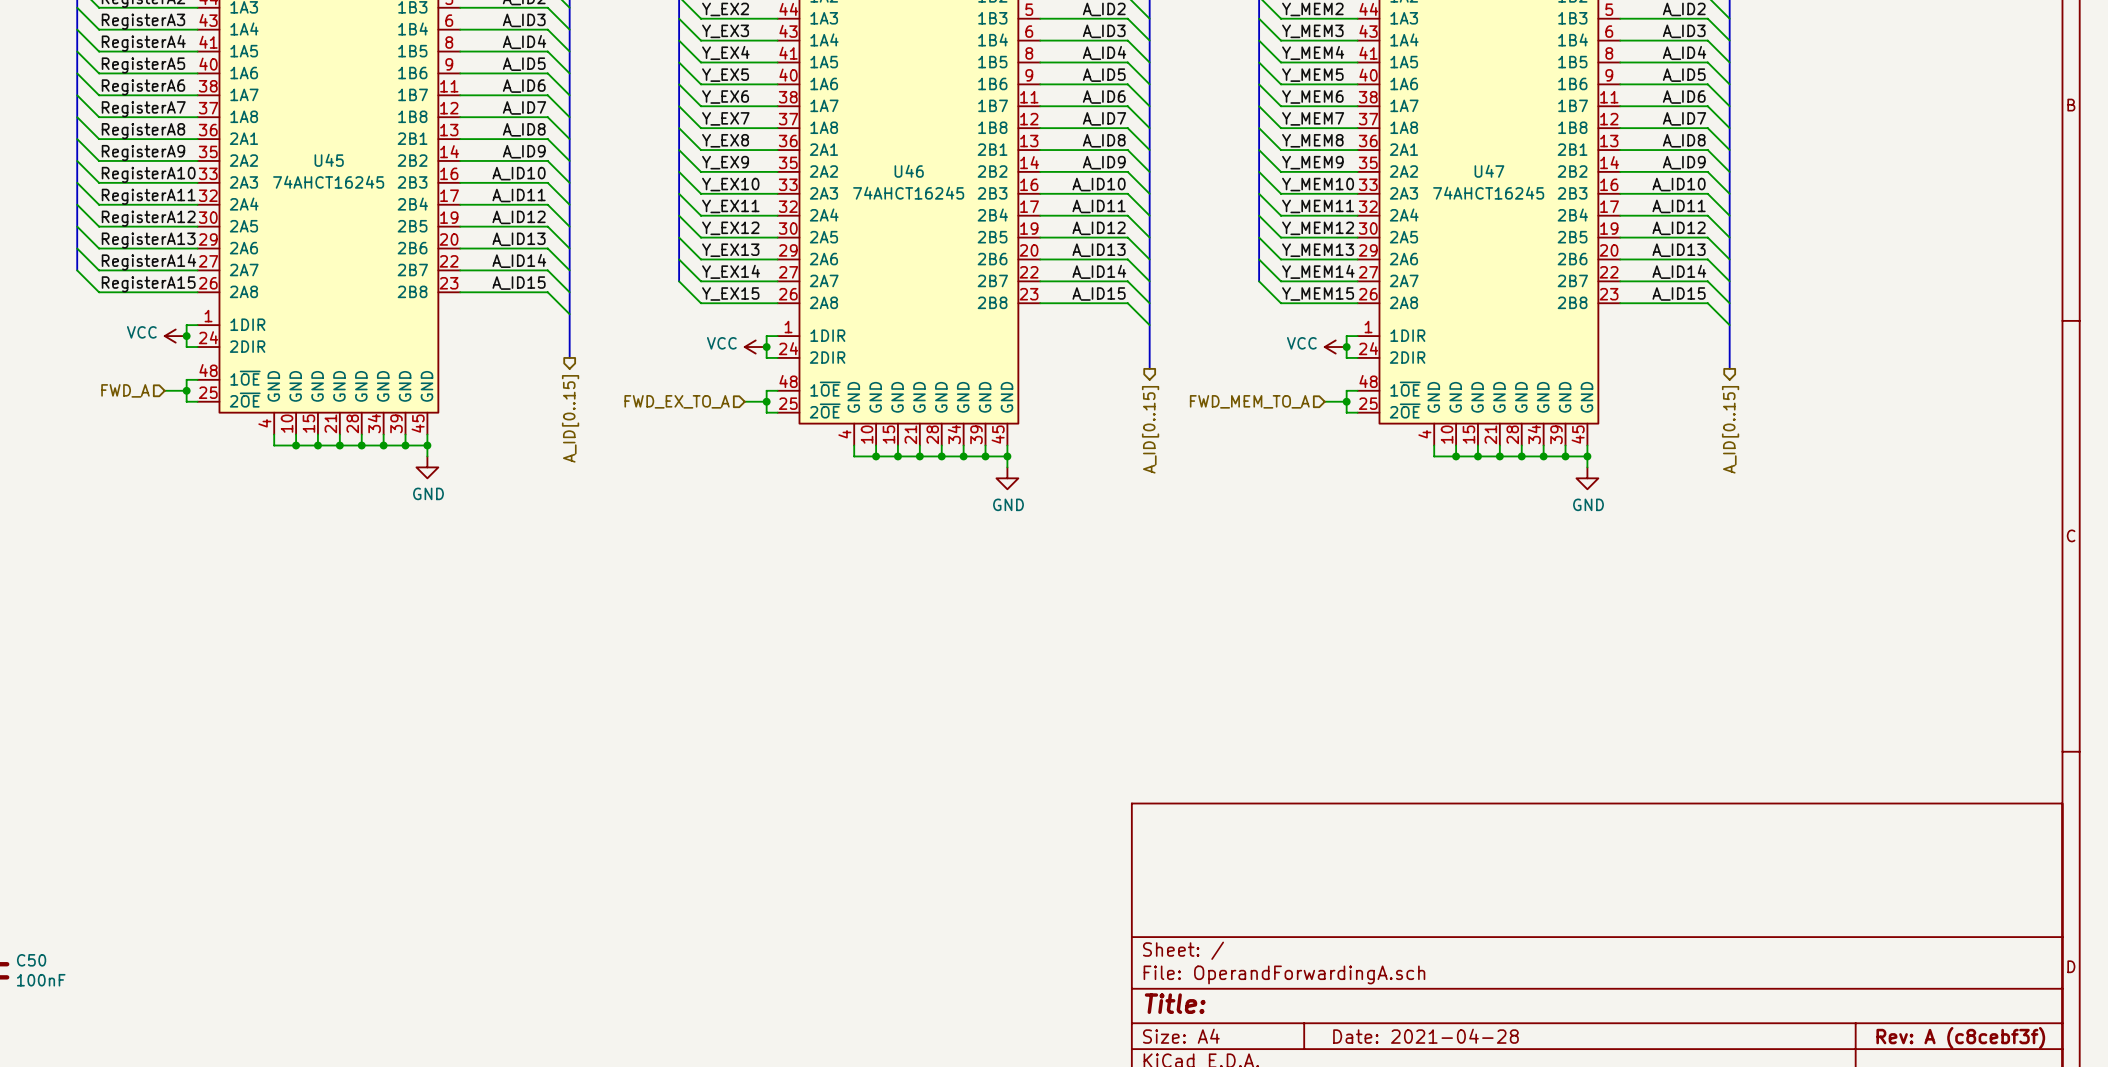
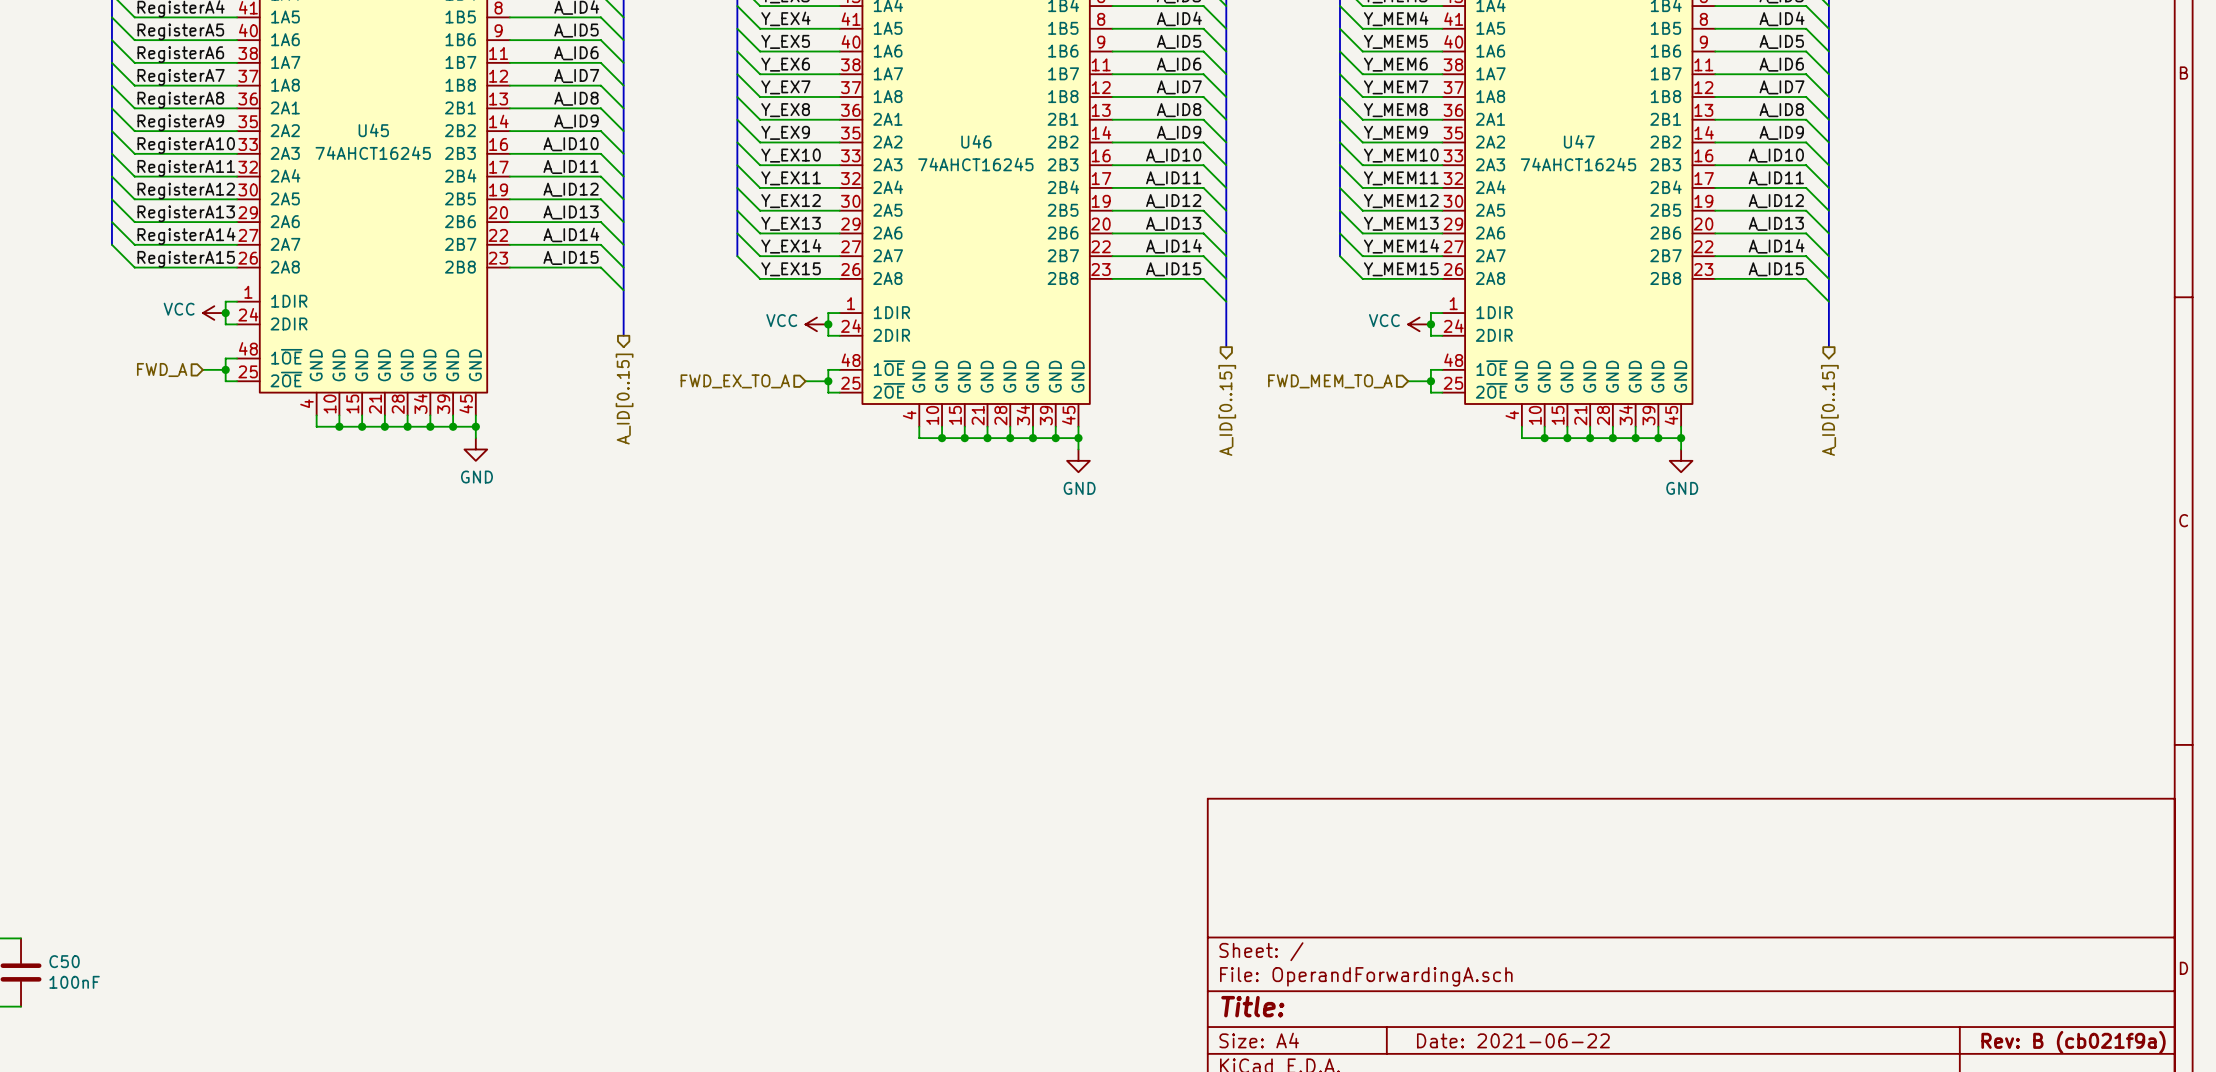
title block: Date: 2021-04-28 (1426, 1036) -> Date: 2021-06-22 (1513, 1040)
title block: Rev: A (c8cebf3f) (1960, 1038) -> Rev: B (cb021f9a) (2073, 1042)

